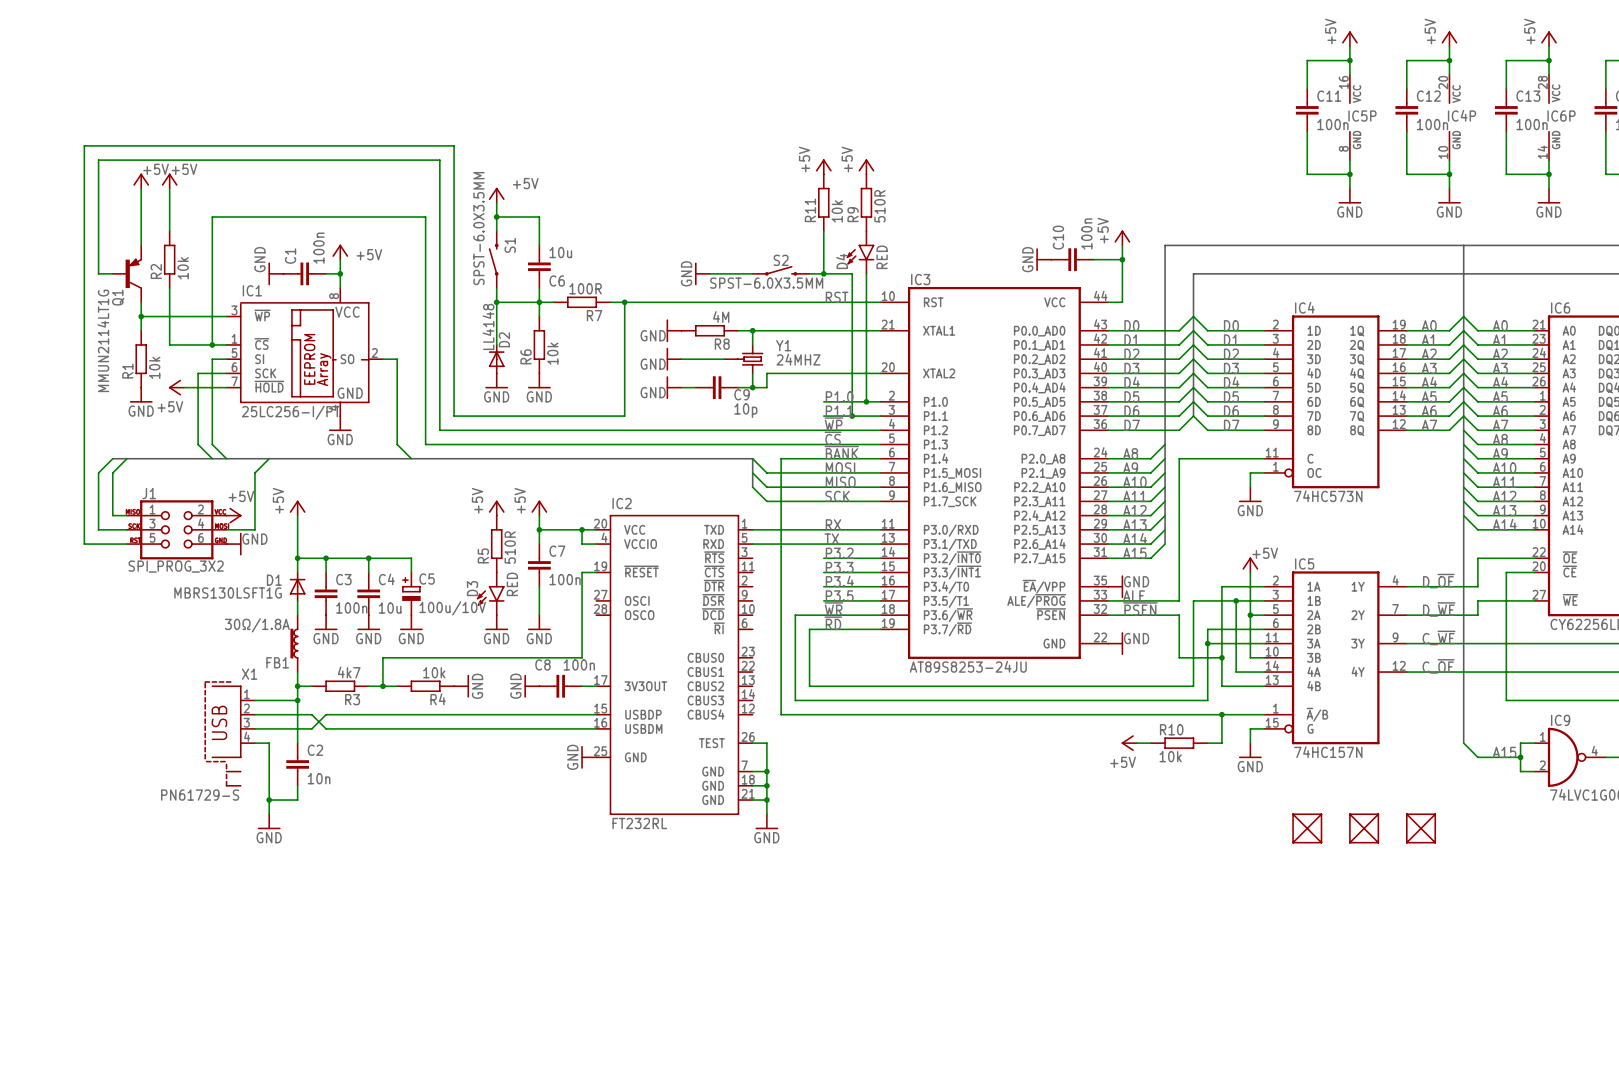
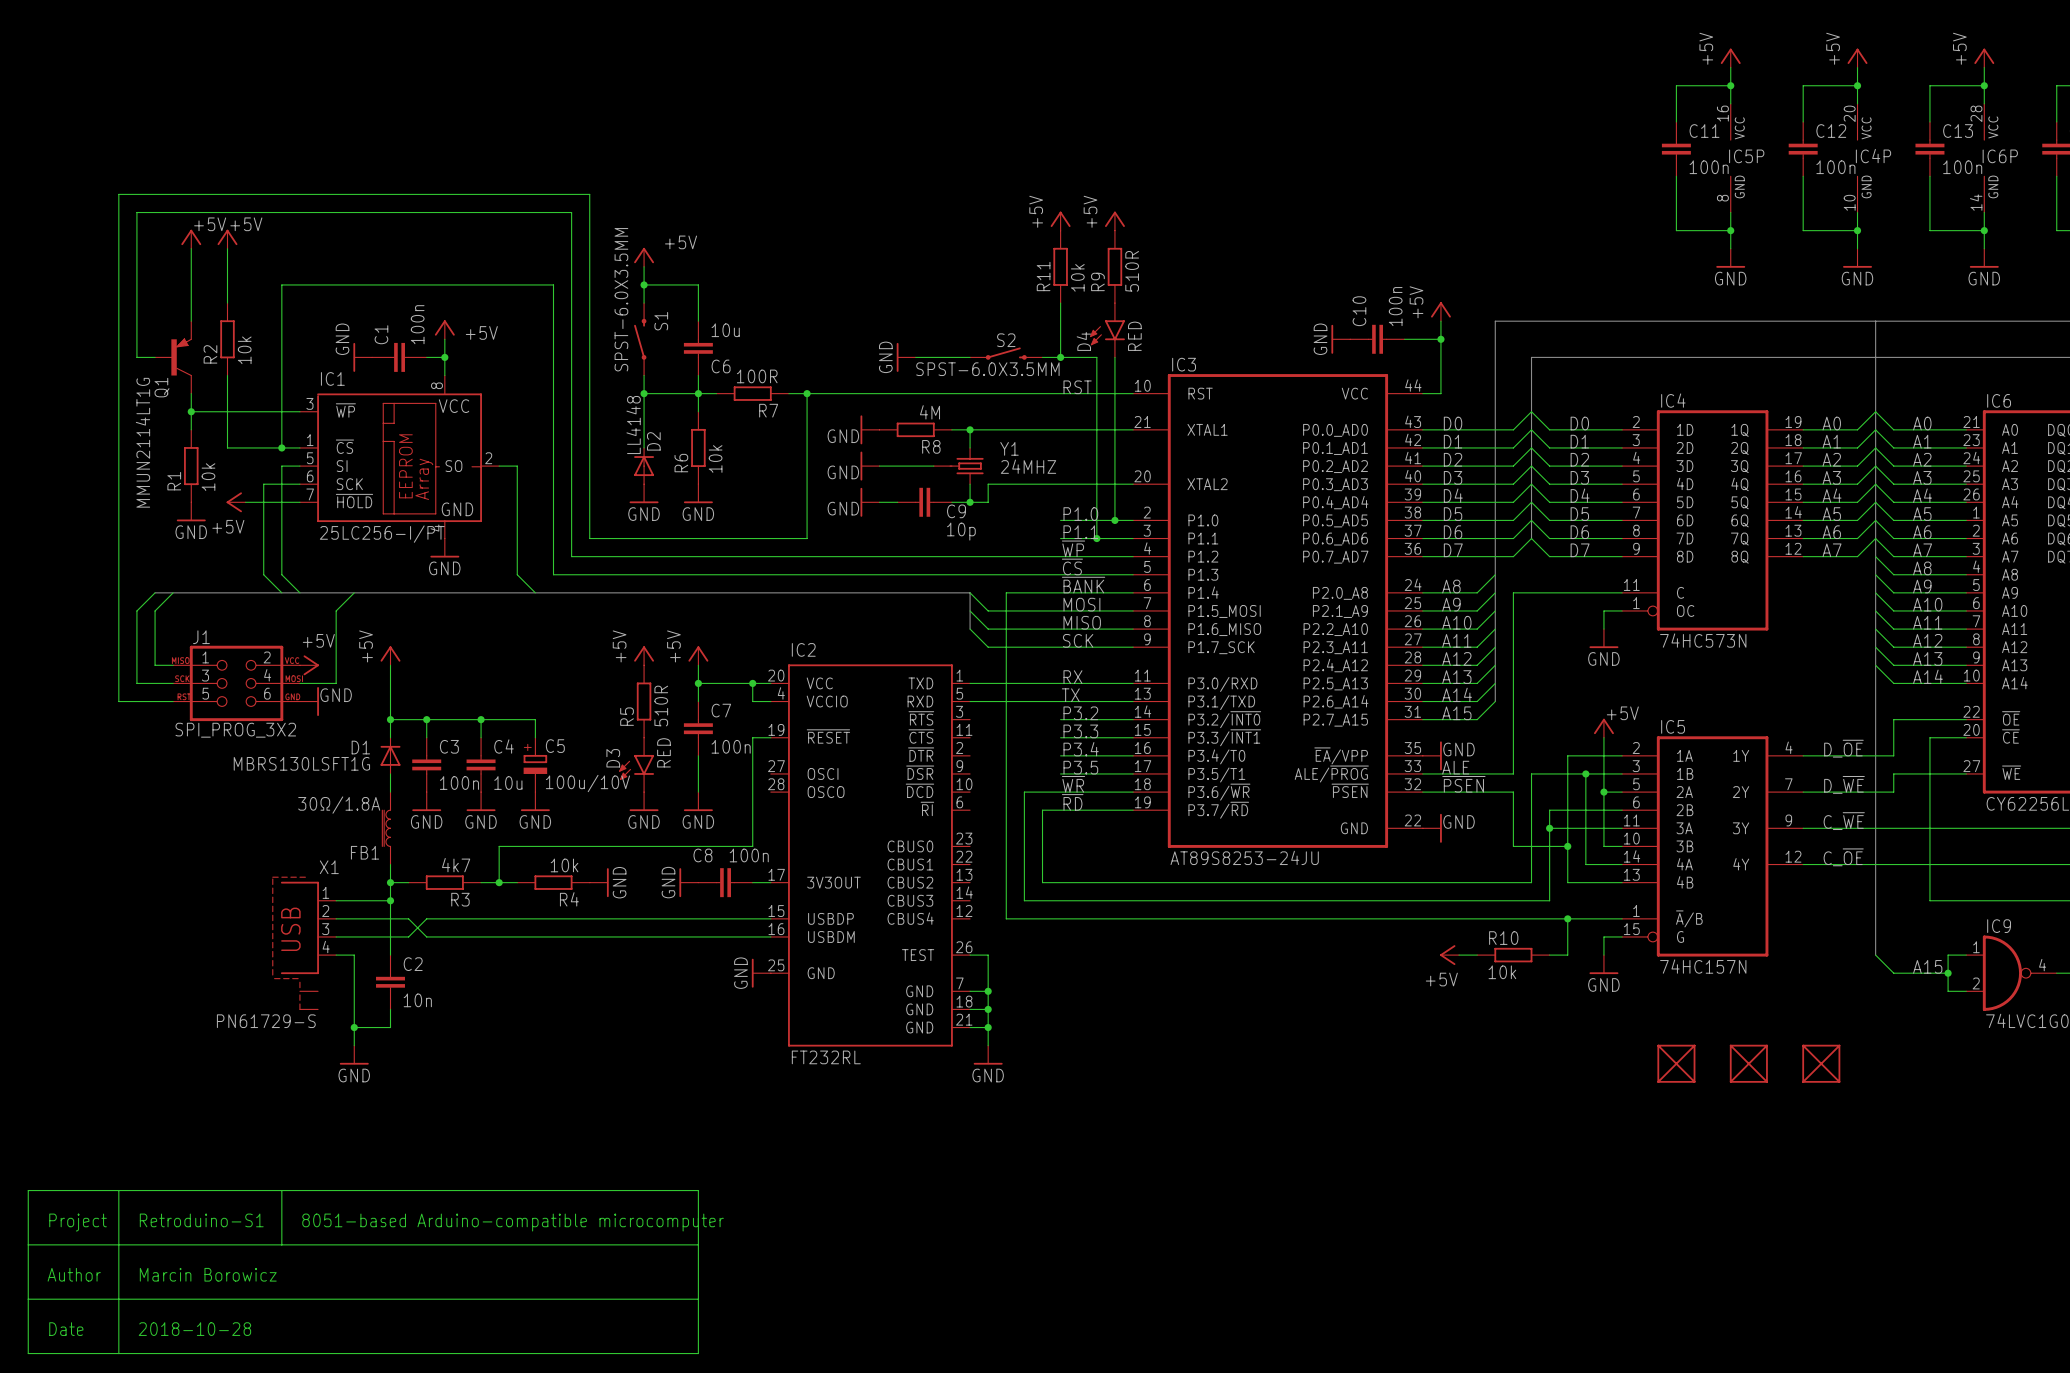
wire: none -> (28, 1190) (28, 1353) (698, 1353) (698, 1190) (28, 1190)
wire: none -> (118, 1190) (118, 1353)
wire: none -> (281, 1190) (281, 1244)
text: none -> Retroduino-S1 (201, 1220)
text: none -> Project (78, 1222)
text: none -> 8051-based Arduino-compatible microcomputer (513, 1222)
wire: none -> (28, 1244) (698, 1244)
text: none -> Author (74, 1274)
text: none -> Marcin Borowicz (208, 1274)
wire: none -> (28, 1299) (698, 1299)
text: none -> Date (66, 1329)
text: none -> 2018-10-28 (194, 1329)

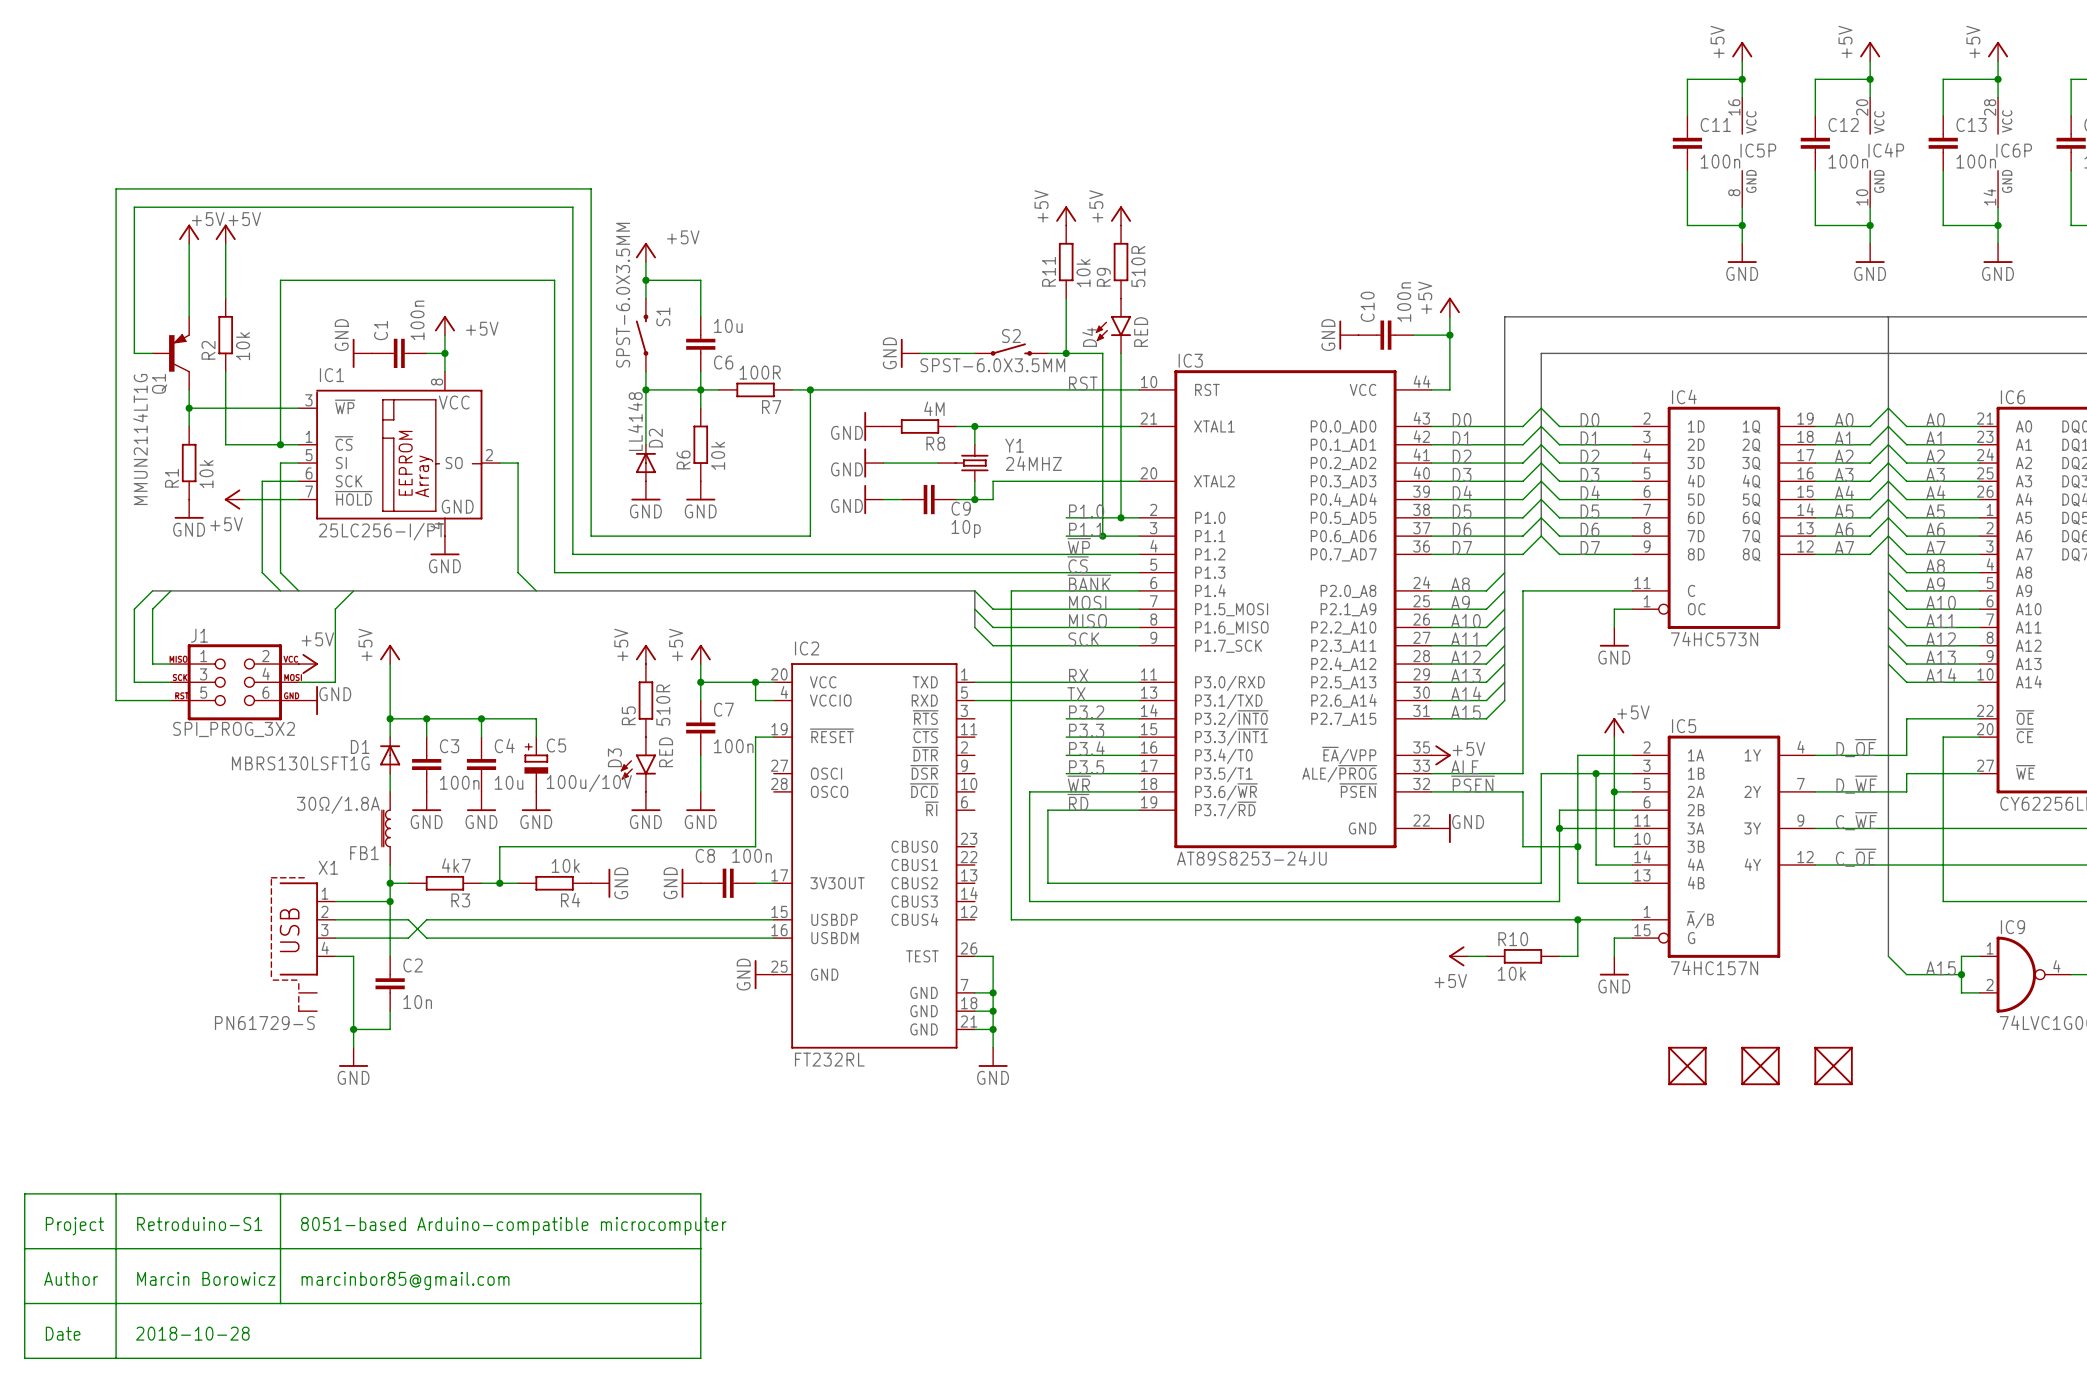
power symbol: GND (1432, 755) -> +5V (1441, 755)
wire: none -> (280, 1248) (280, 1303)
text: none -> marcinbor85@gmail.com (405, 1280)

